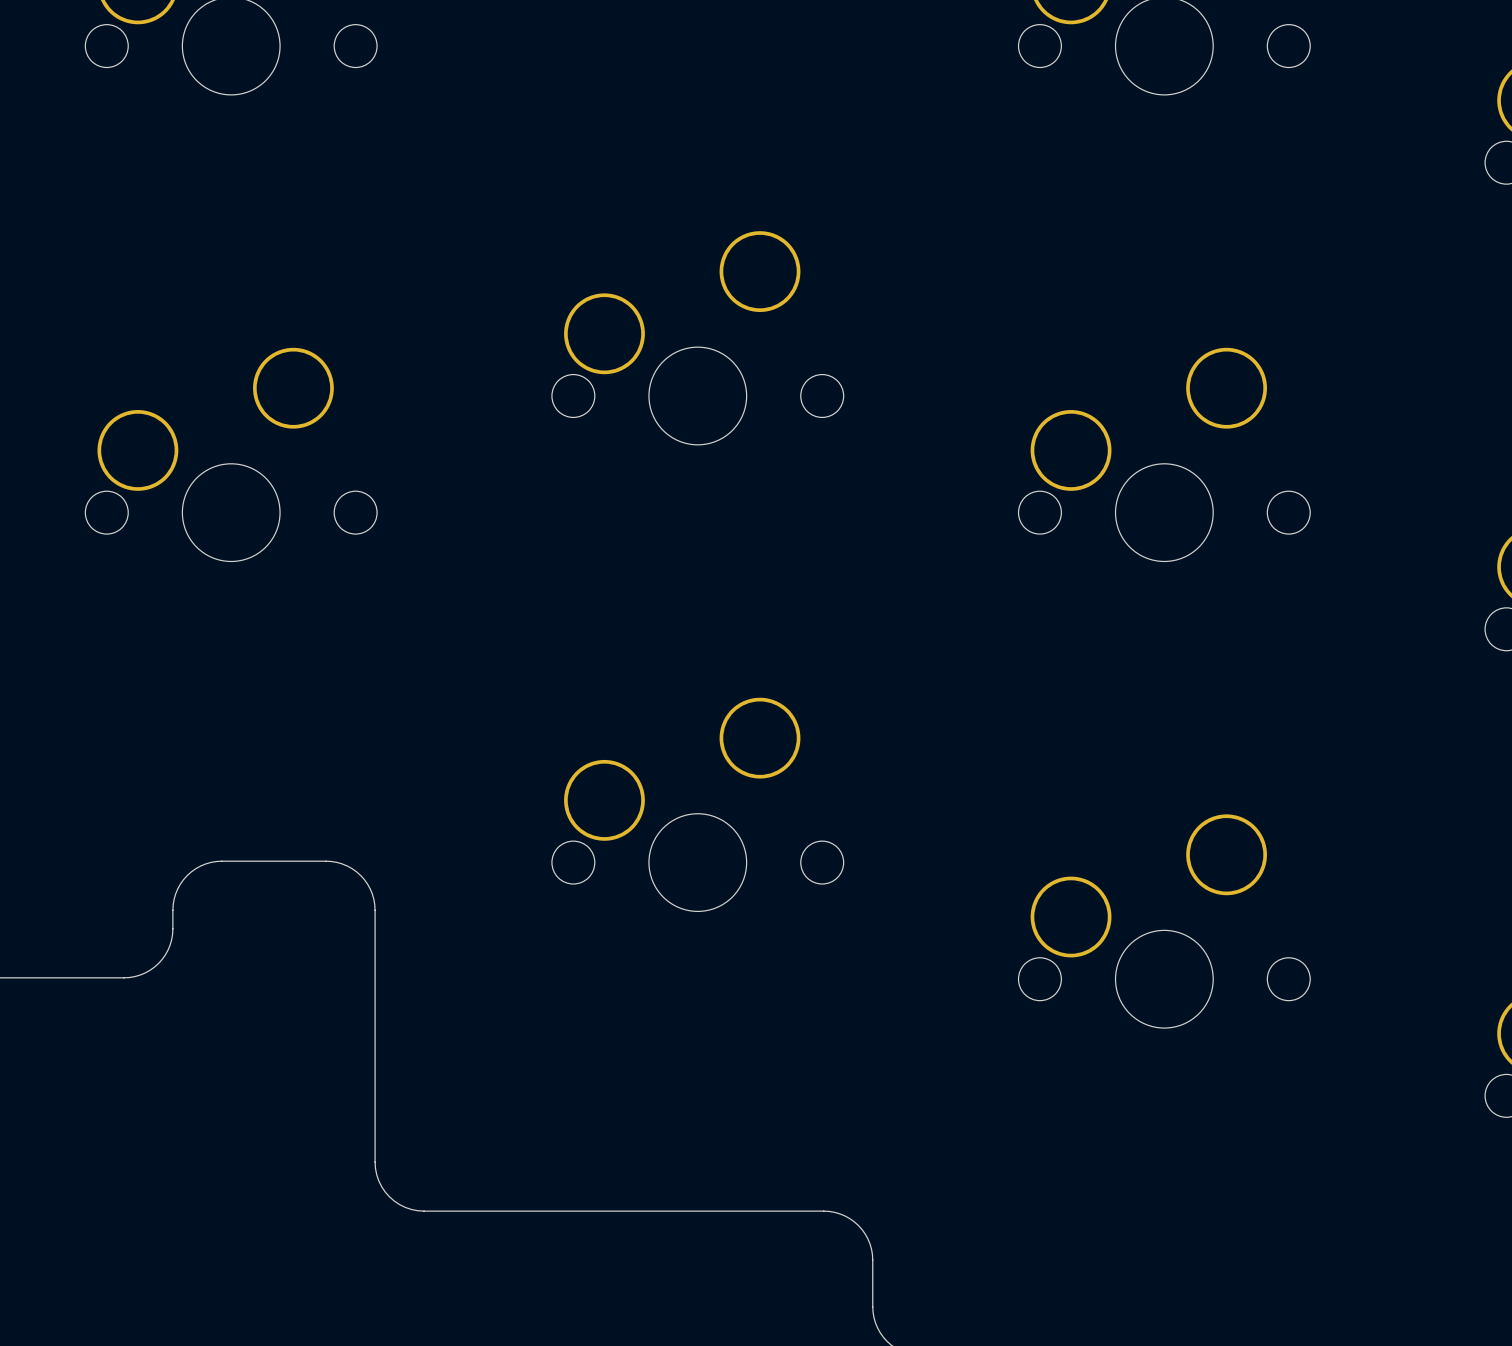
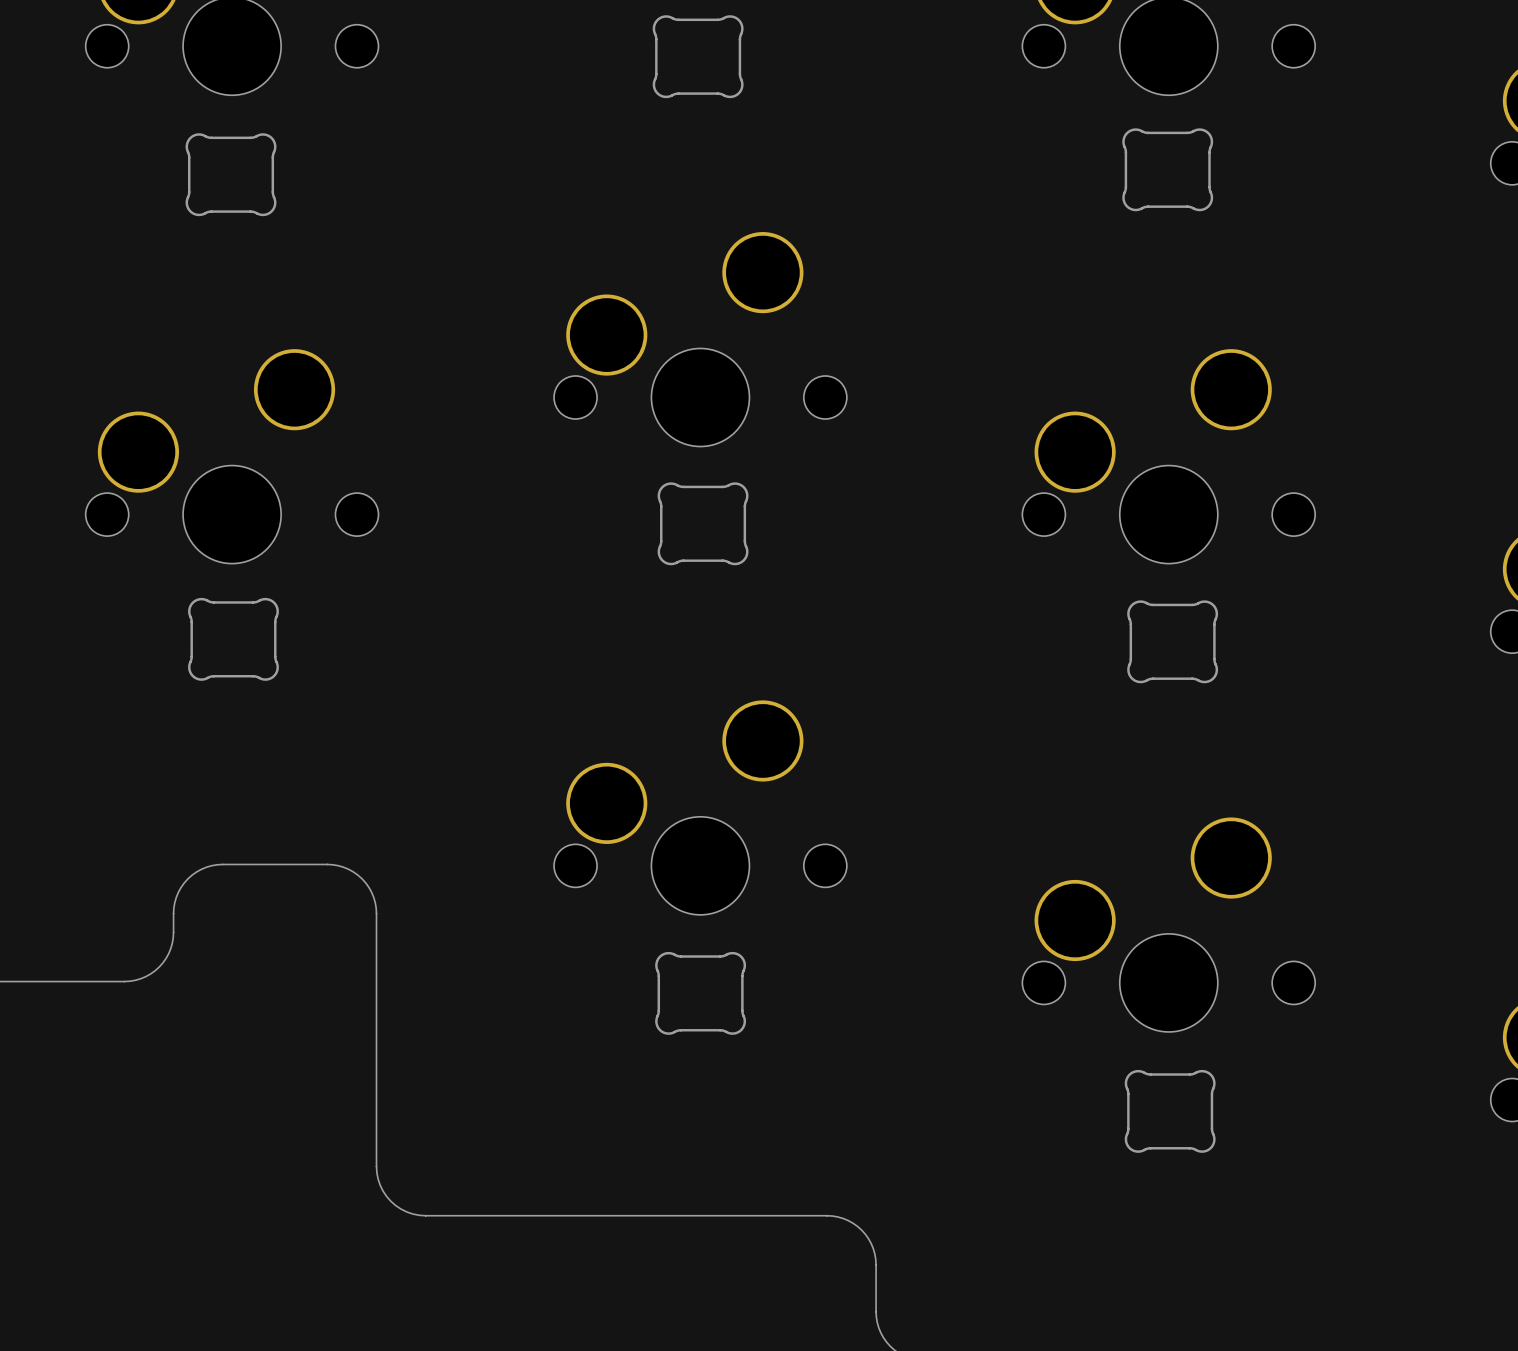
part: none -> (698, 56)
part: none -> (1167, 169)
part: none -> (231, 174)
part: none -> (703, 523)
part: none -> (233, 639)
part: none -> (1172, 641)
part: none -> (700, 993)
part: none -> (1170, 1111)

